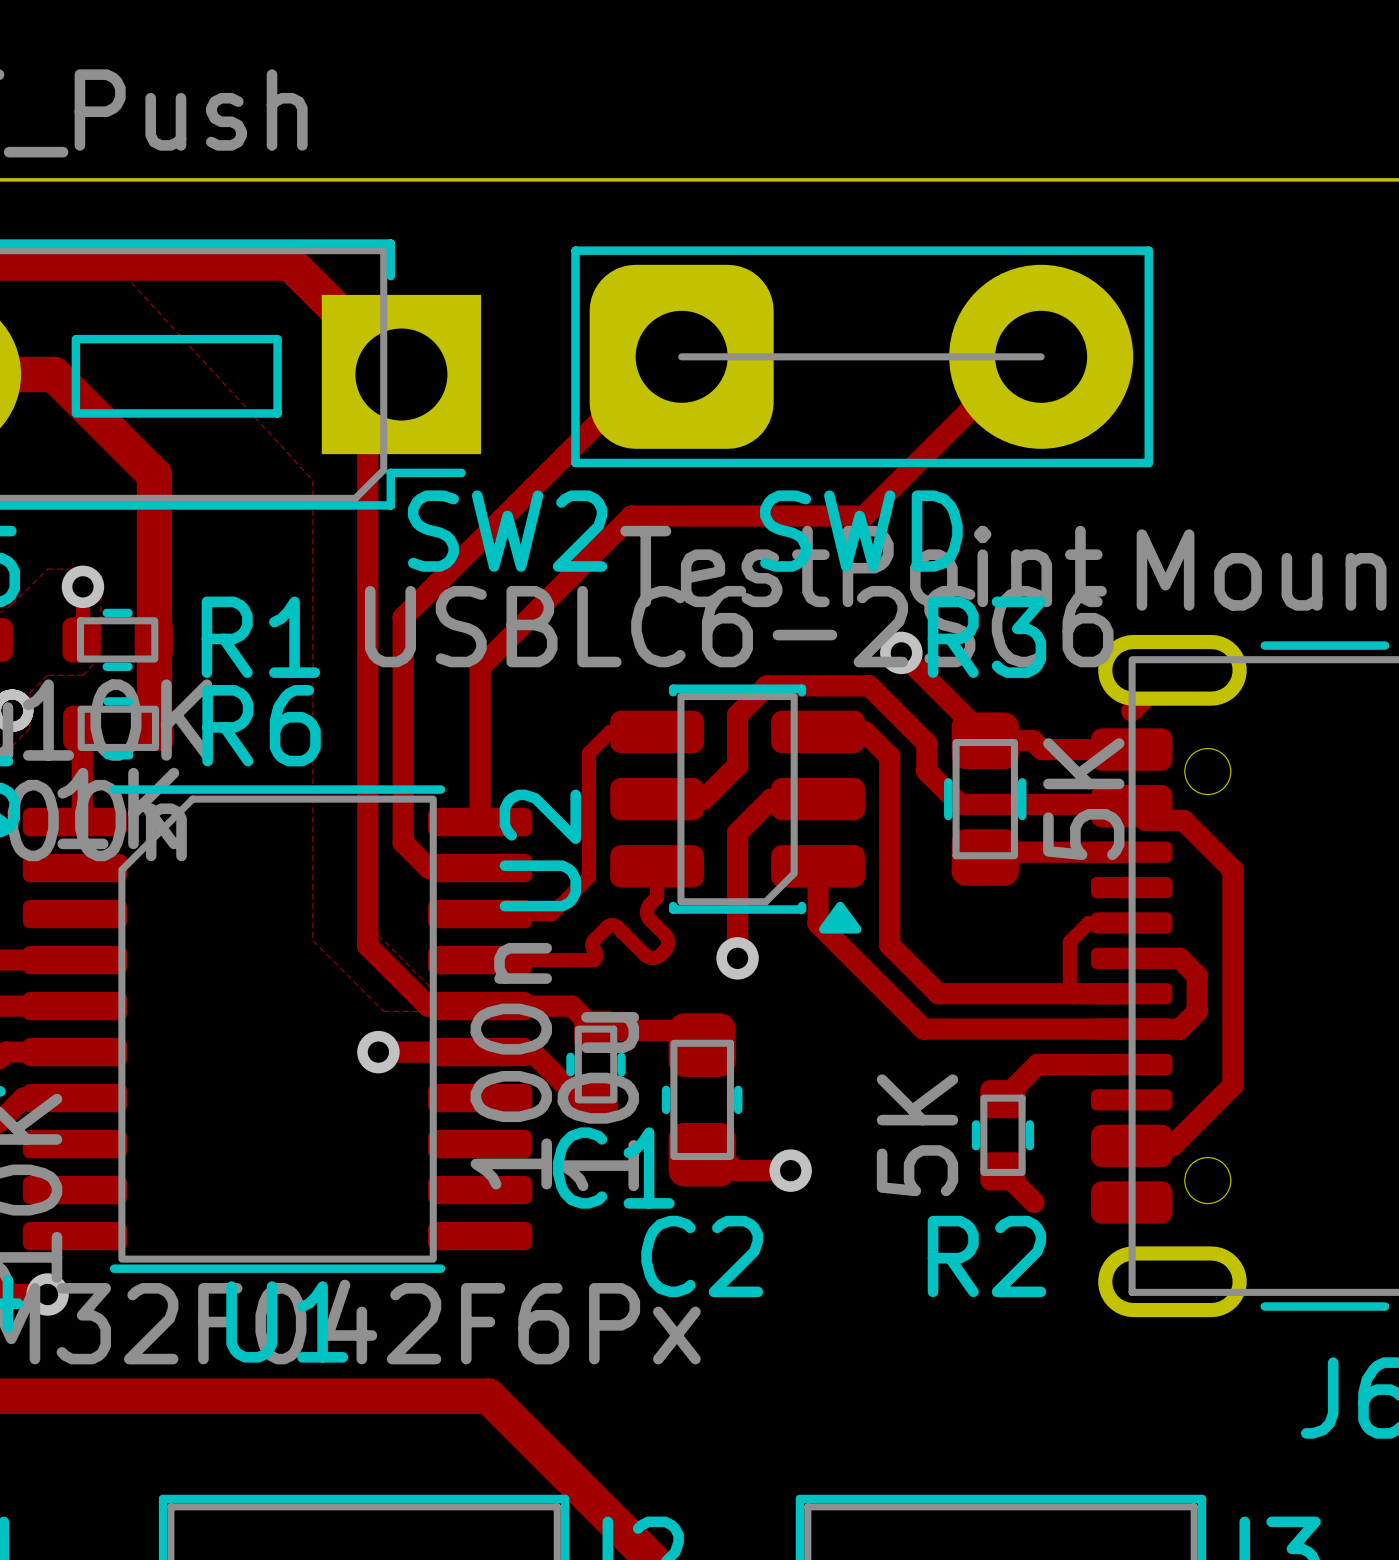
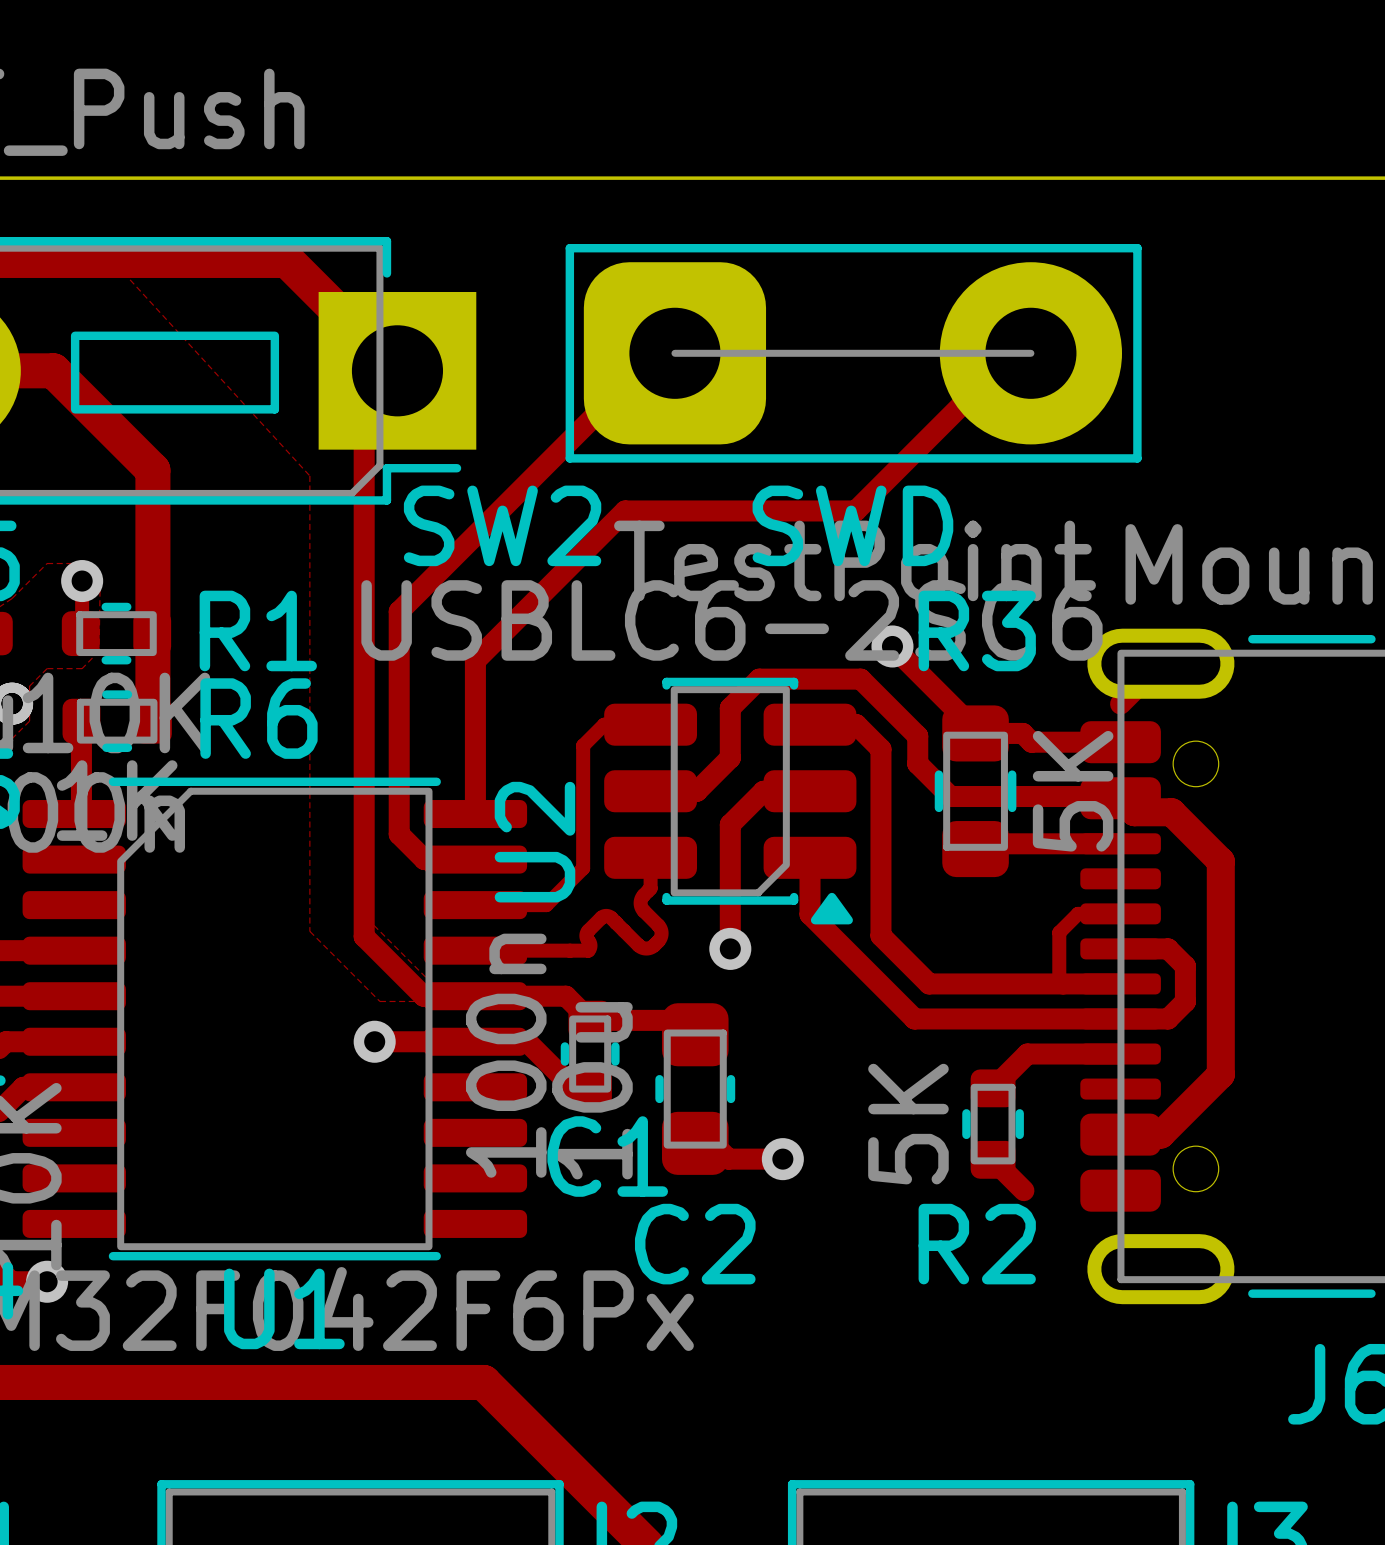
track width: thin (1131, 806) (1145, 820) (1183, 820) (1232, 869) (1232, 1085) (1172, 1145) (1131, 1145) -> thick (1120, 798) (1134, 812) (1171, 812) (1220, 861) (1220, 1074) (1160, 1134) (1120, 1134)

